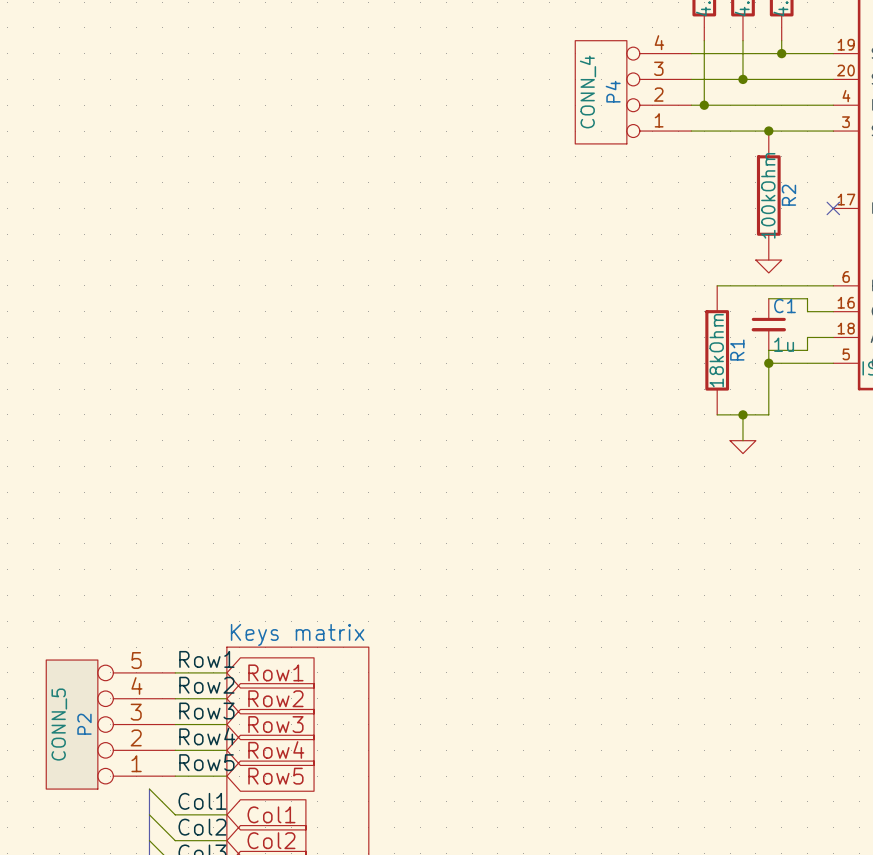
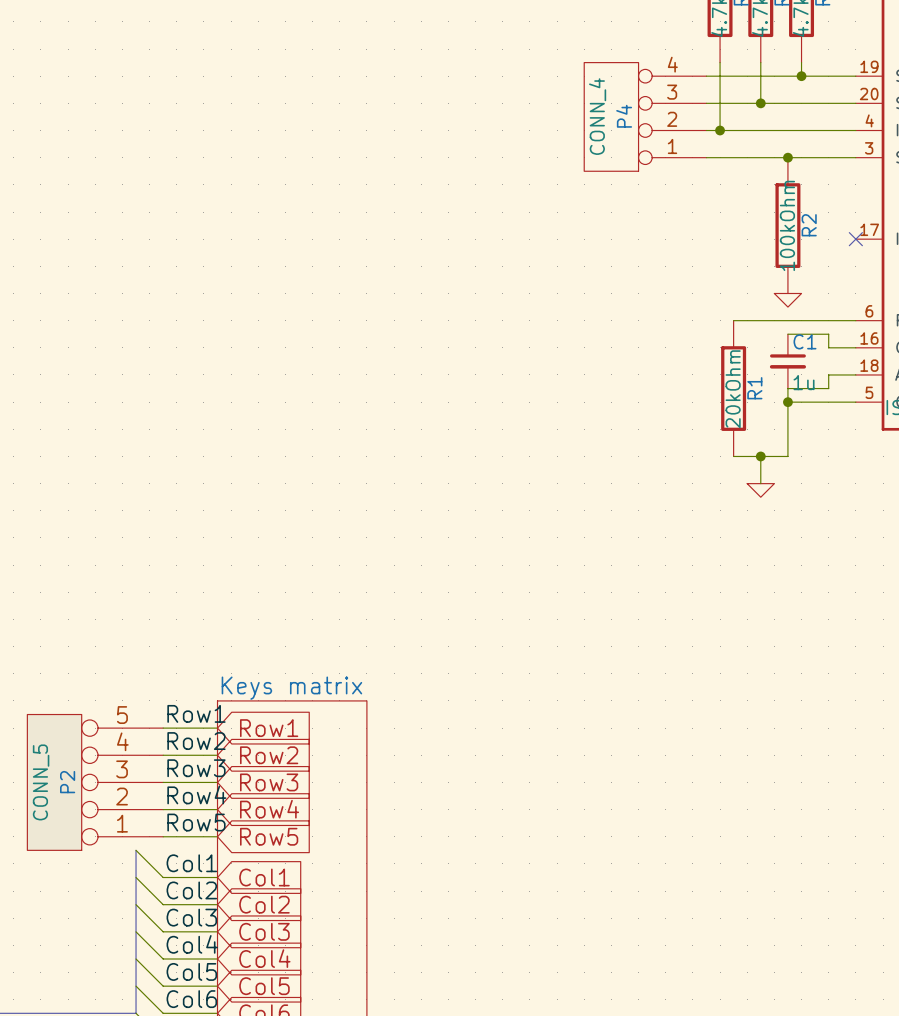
R1 value: 18kOhm (716, 350) -> 20kOhm (733, 389)

